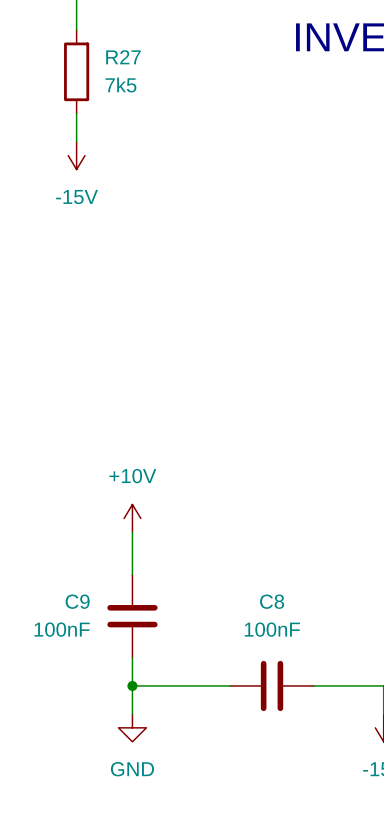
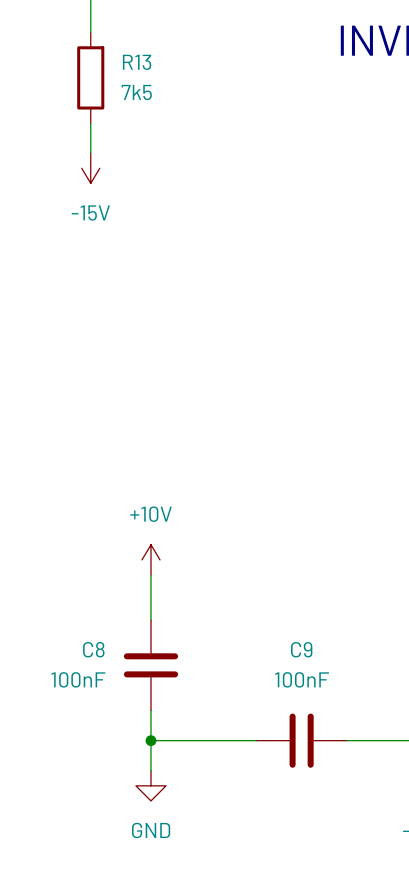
R27 name: R27 (123, 57) -> R13 (137, 62)
C9 name: C9 (77, 601) -> C8 (93, 649)
C8 name: C8 (272, 601) -> C9 (301, 649)

